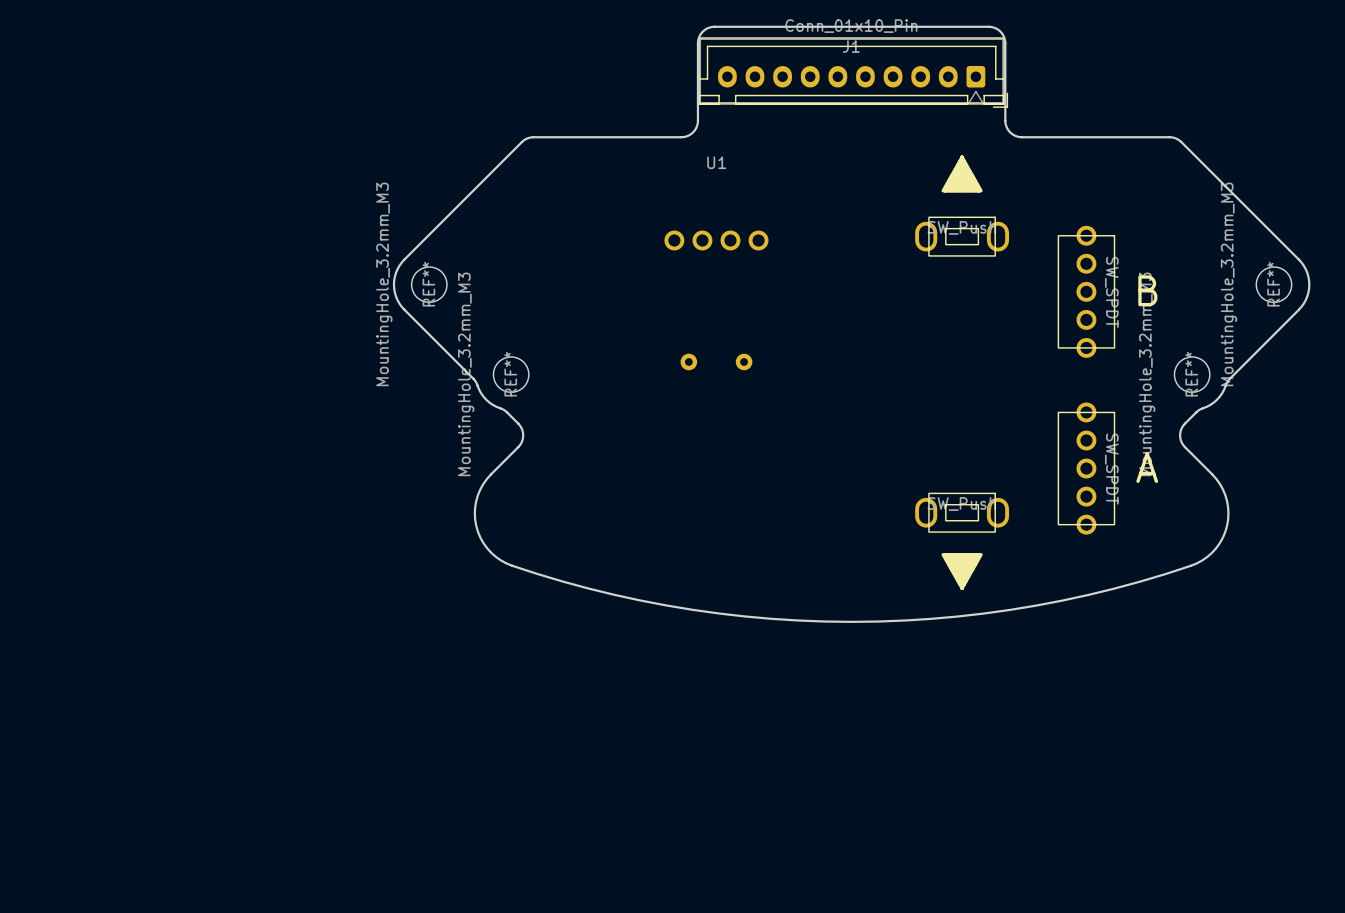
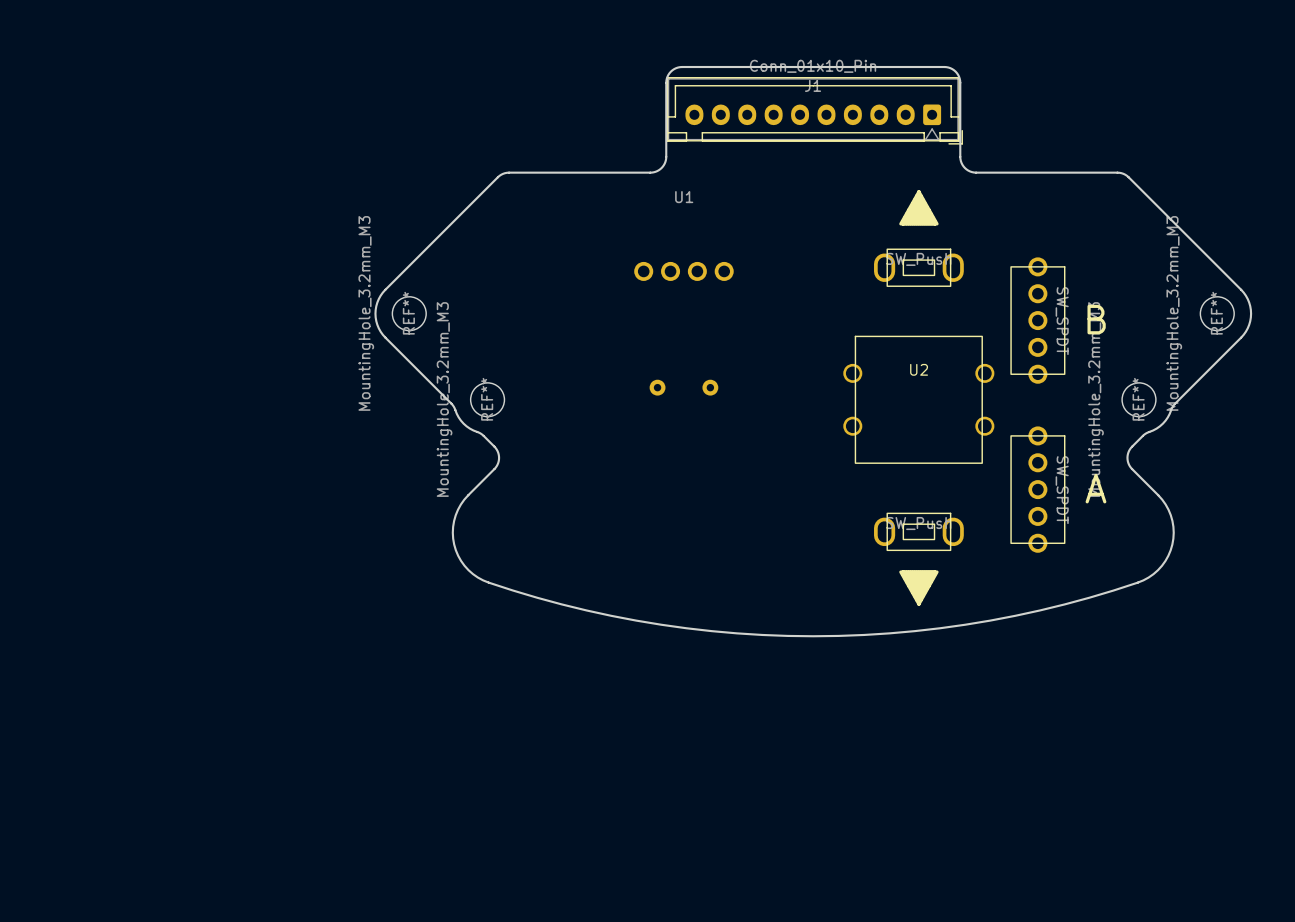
U2: none -> (918, 399)

